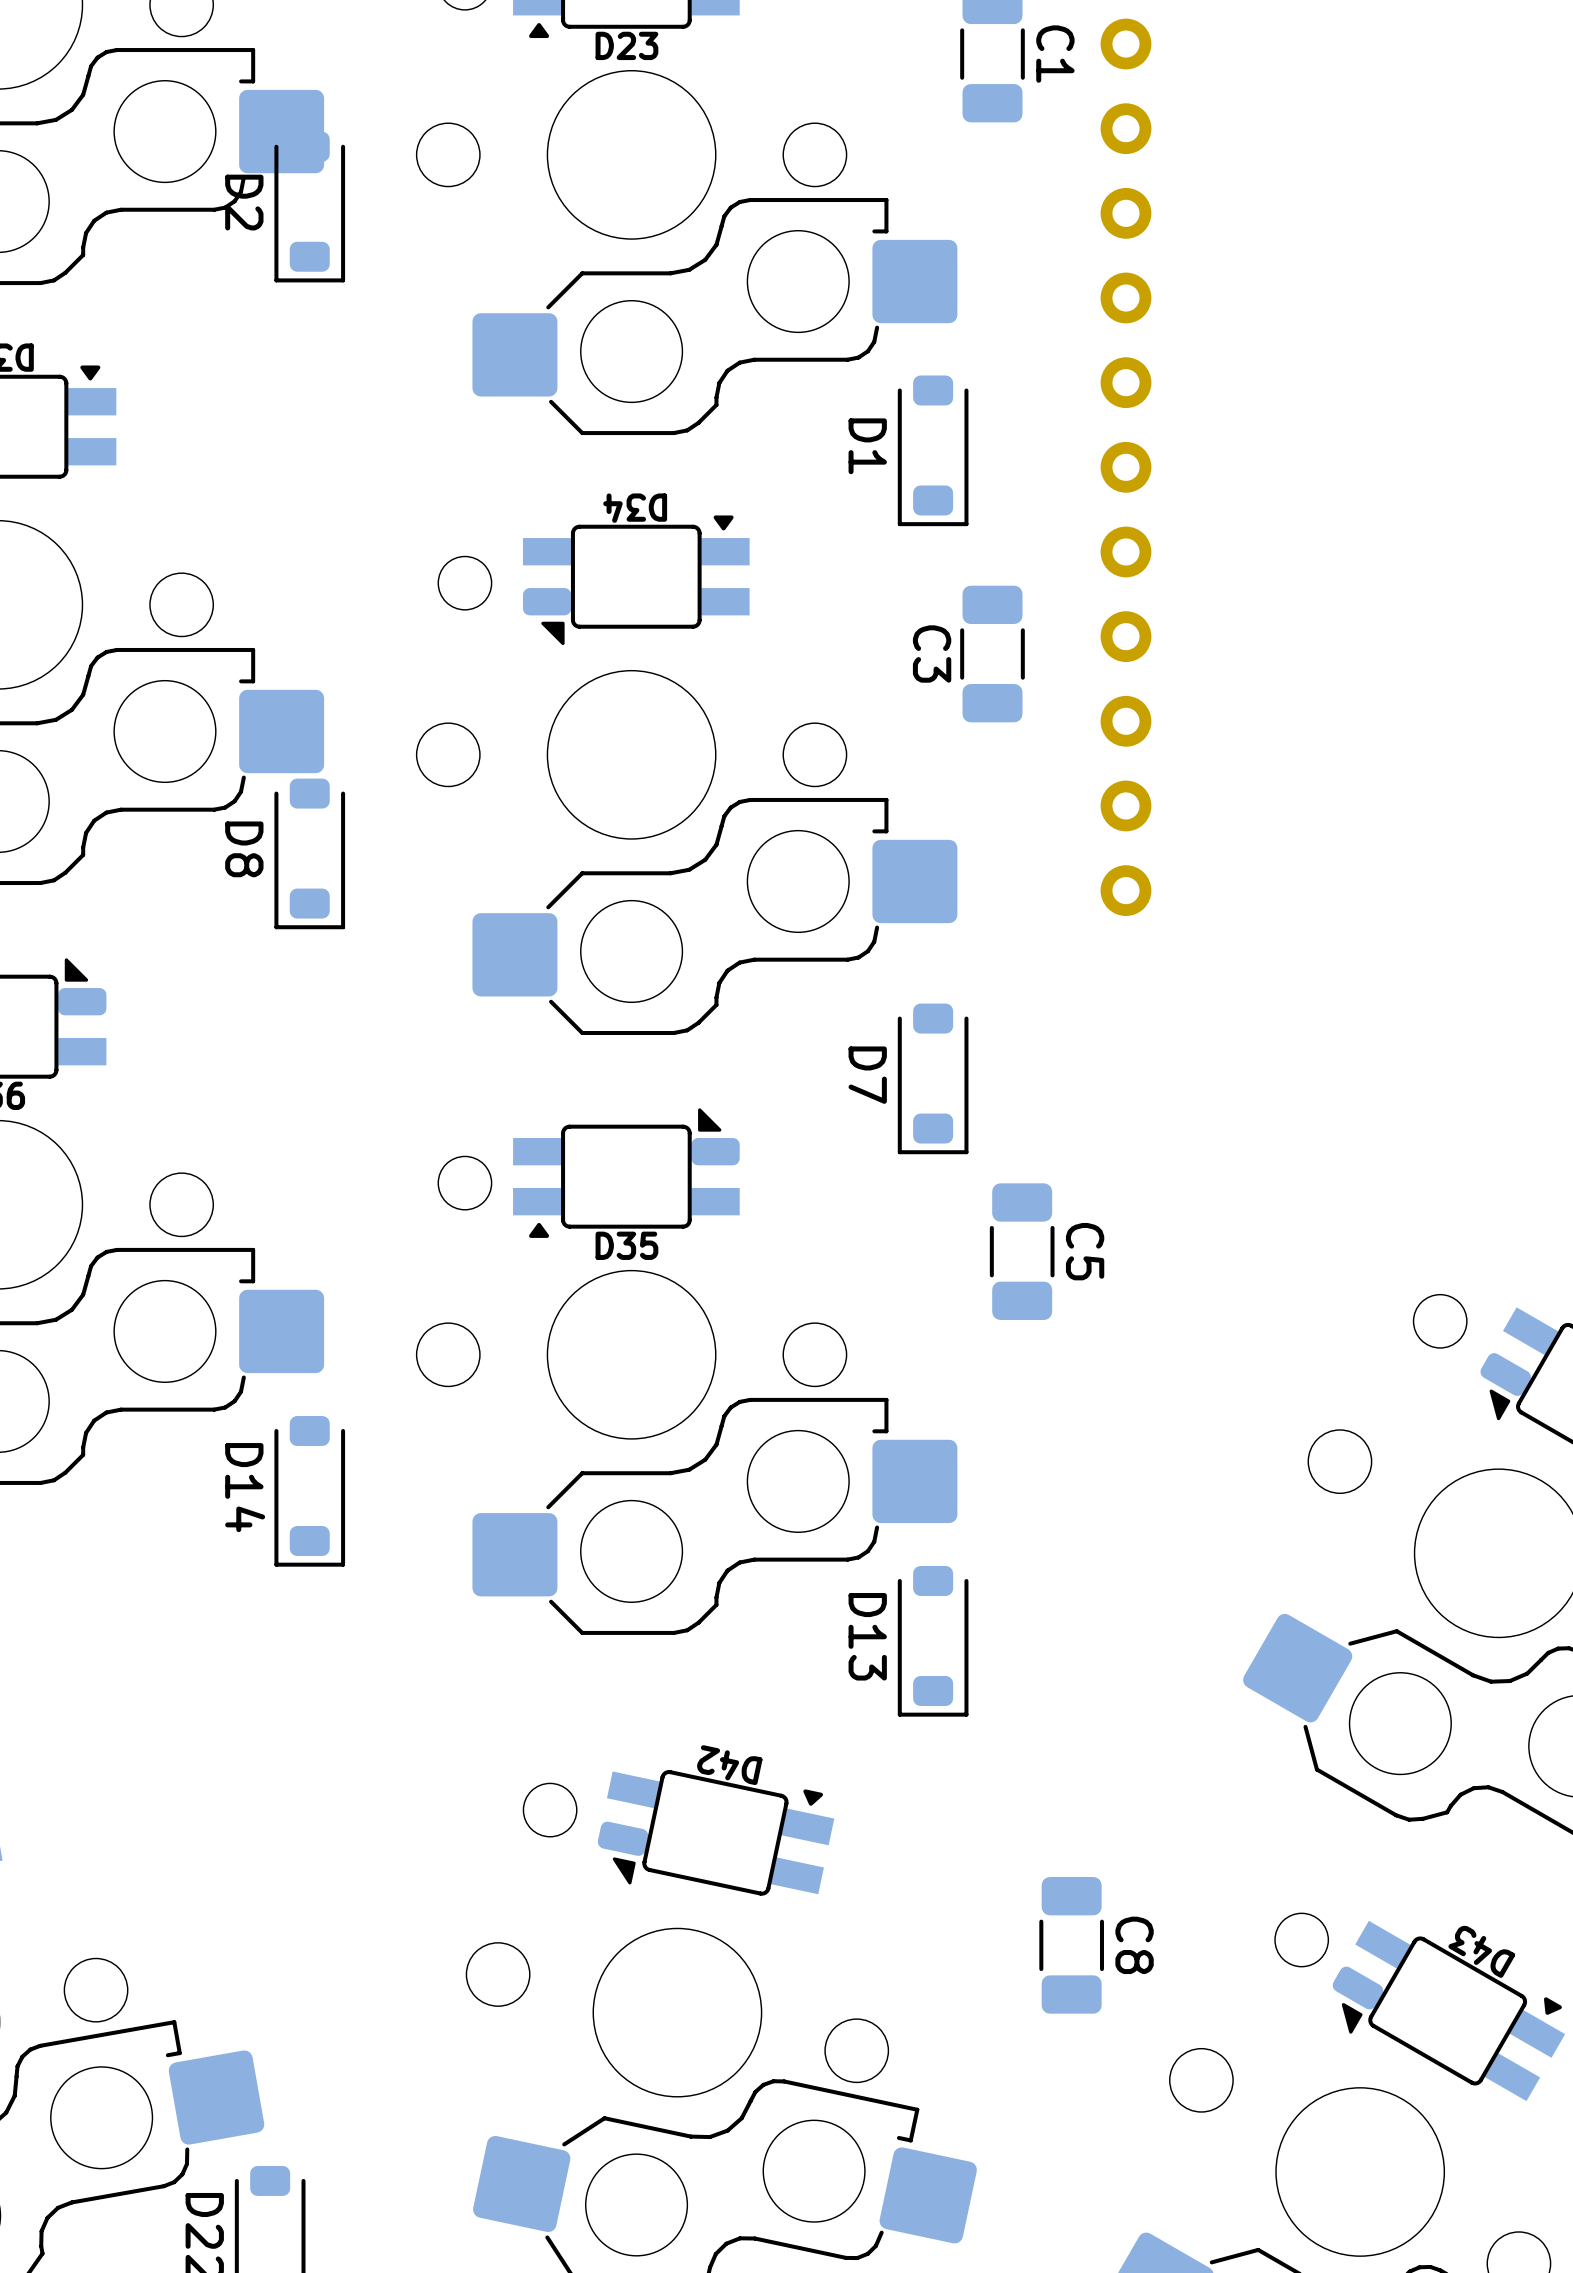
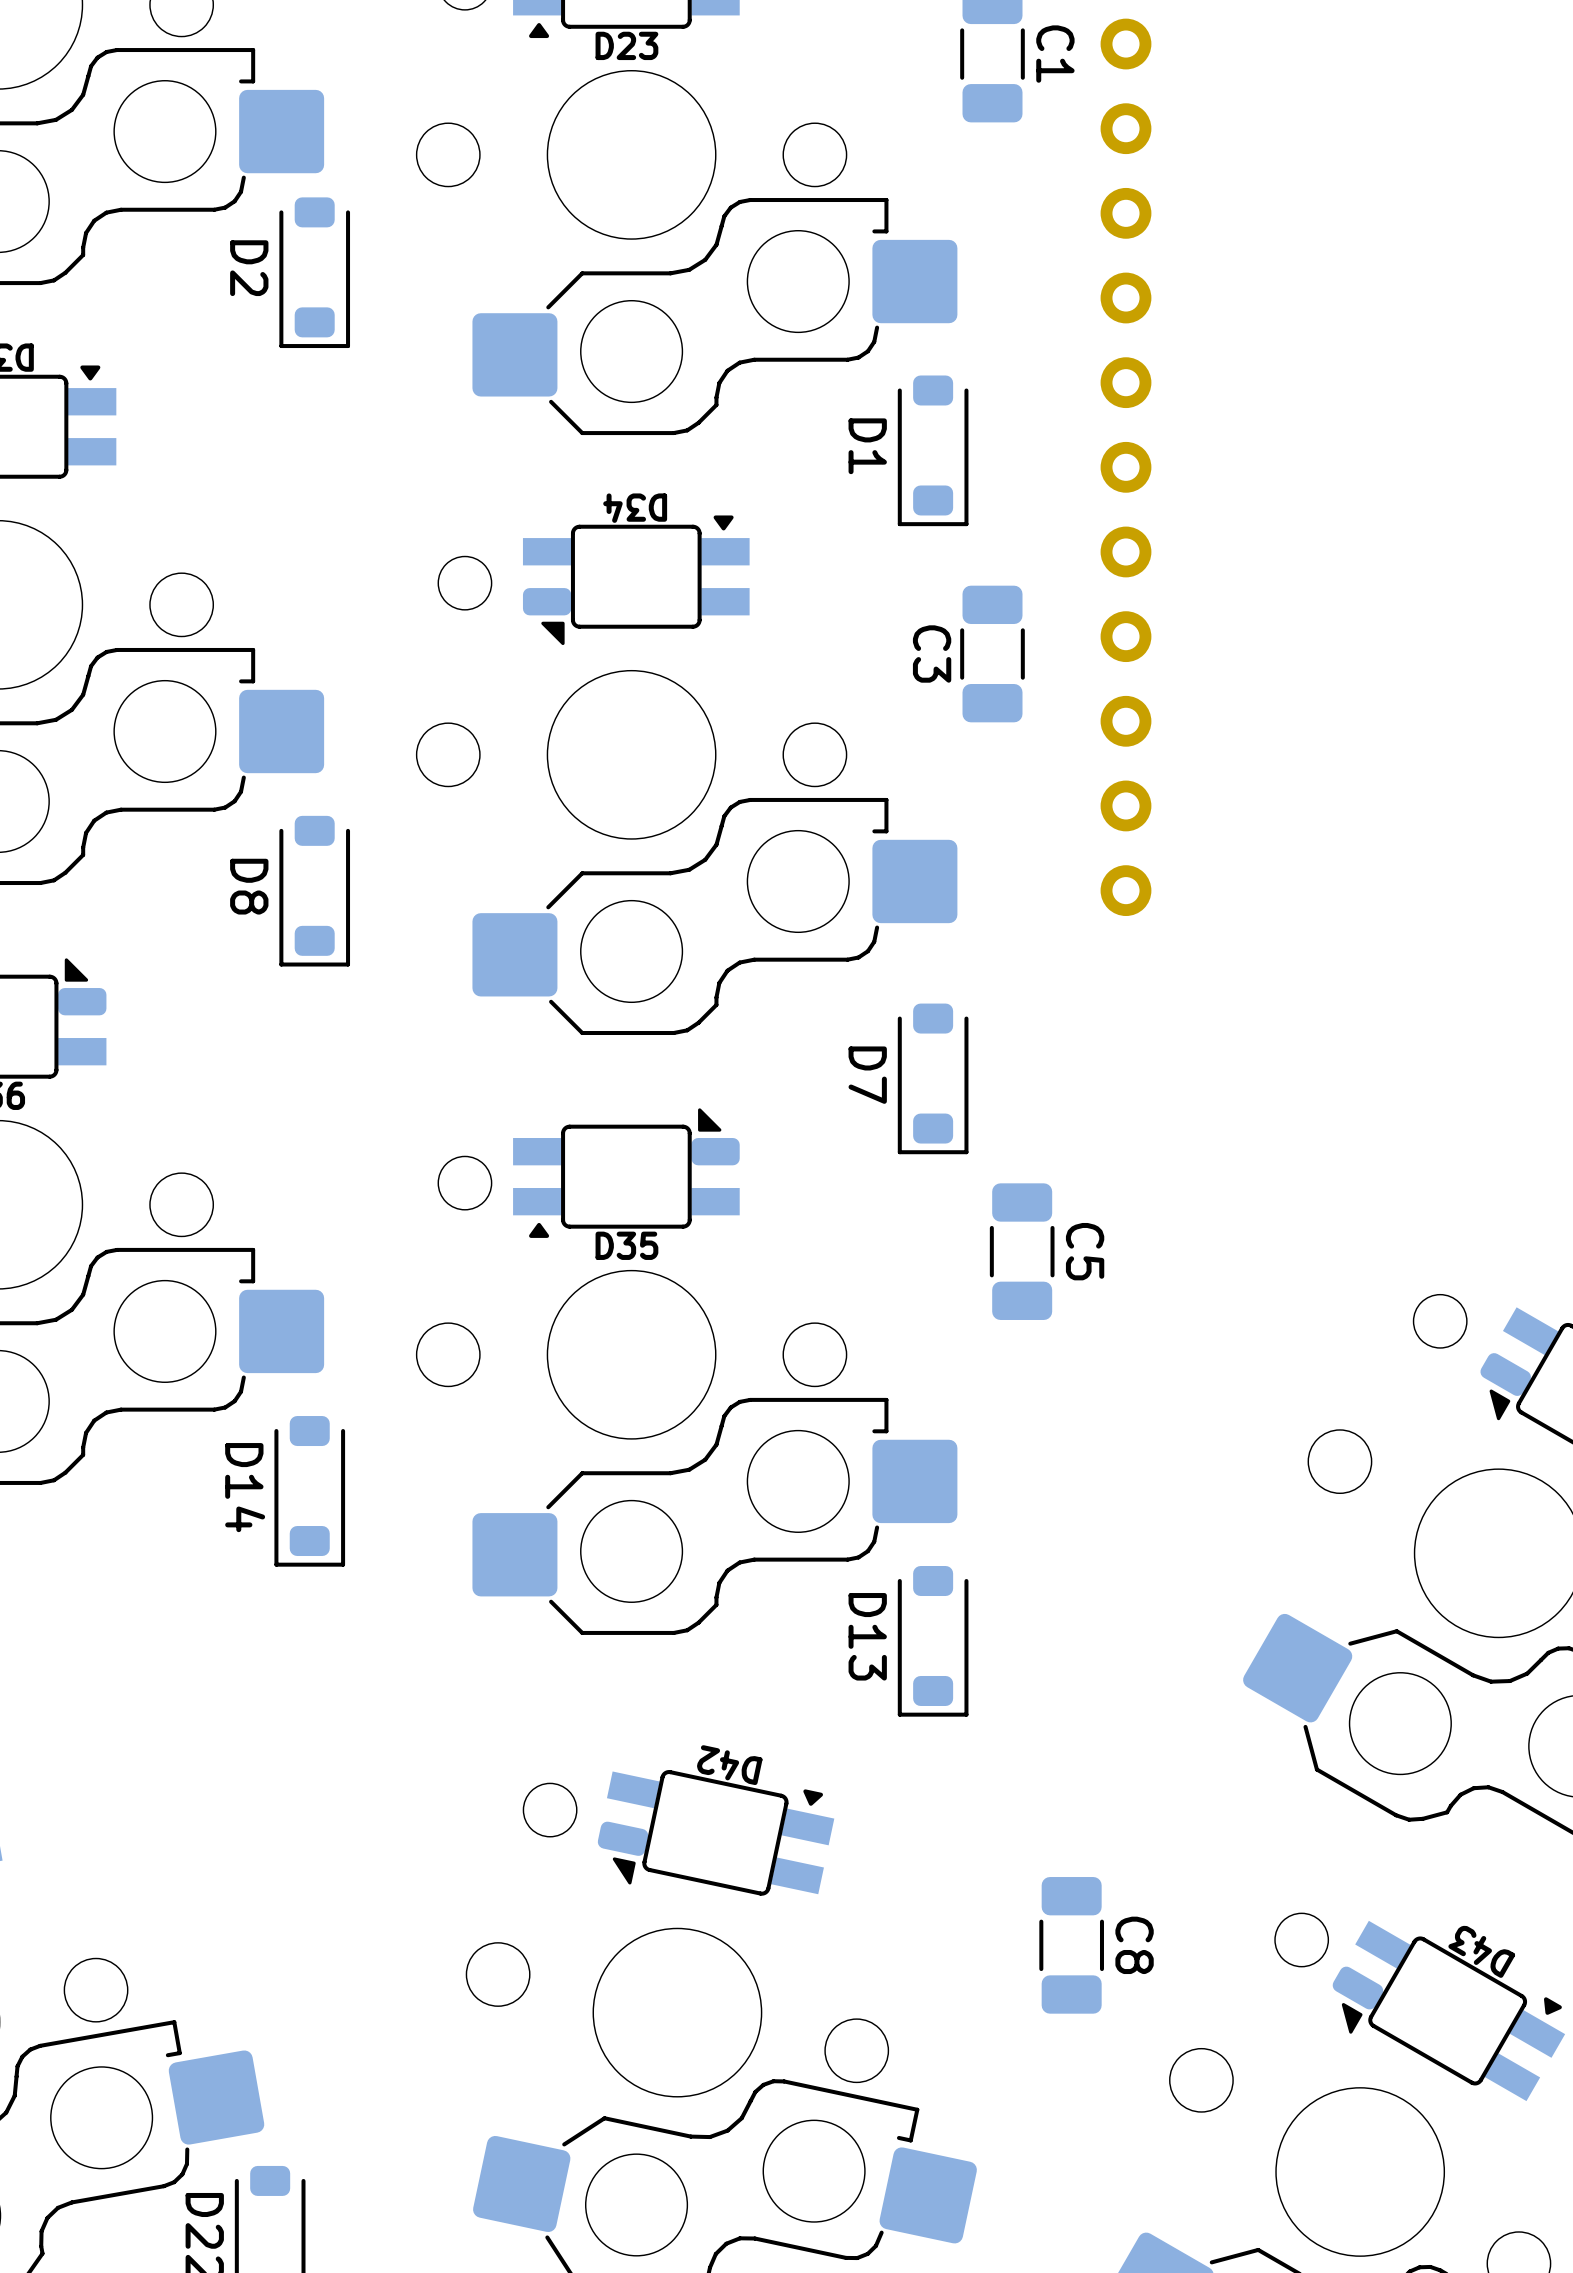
D2 position: (309, 207) -> (314, 272)
D8 position: (309, 853) -> (314, 891)

